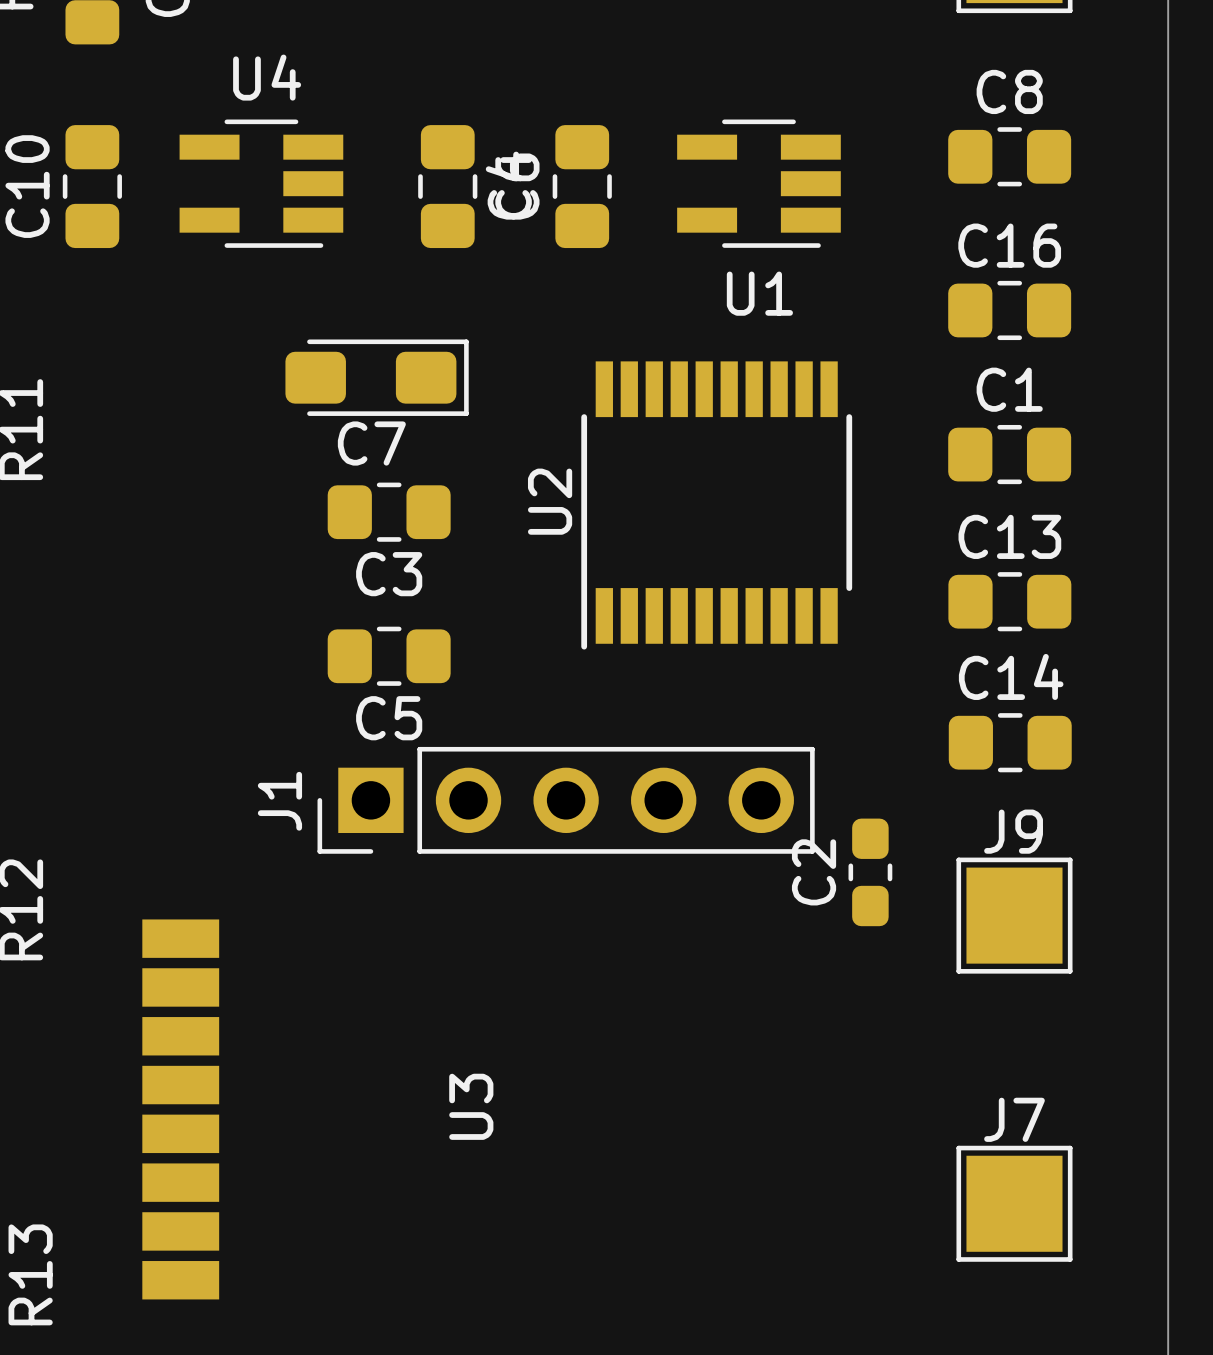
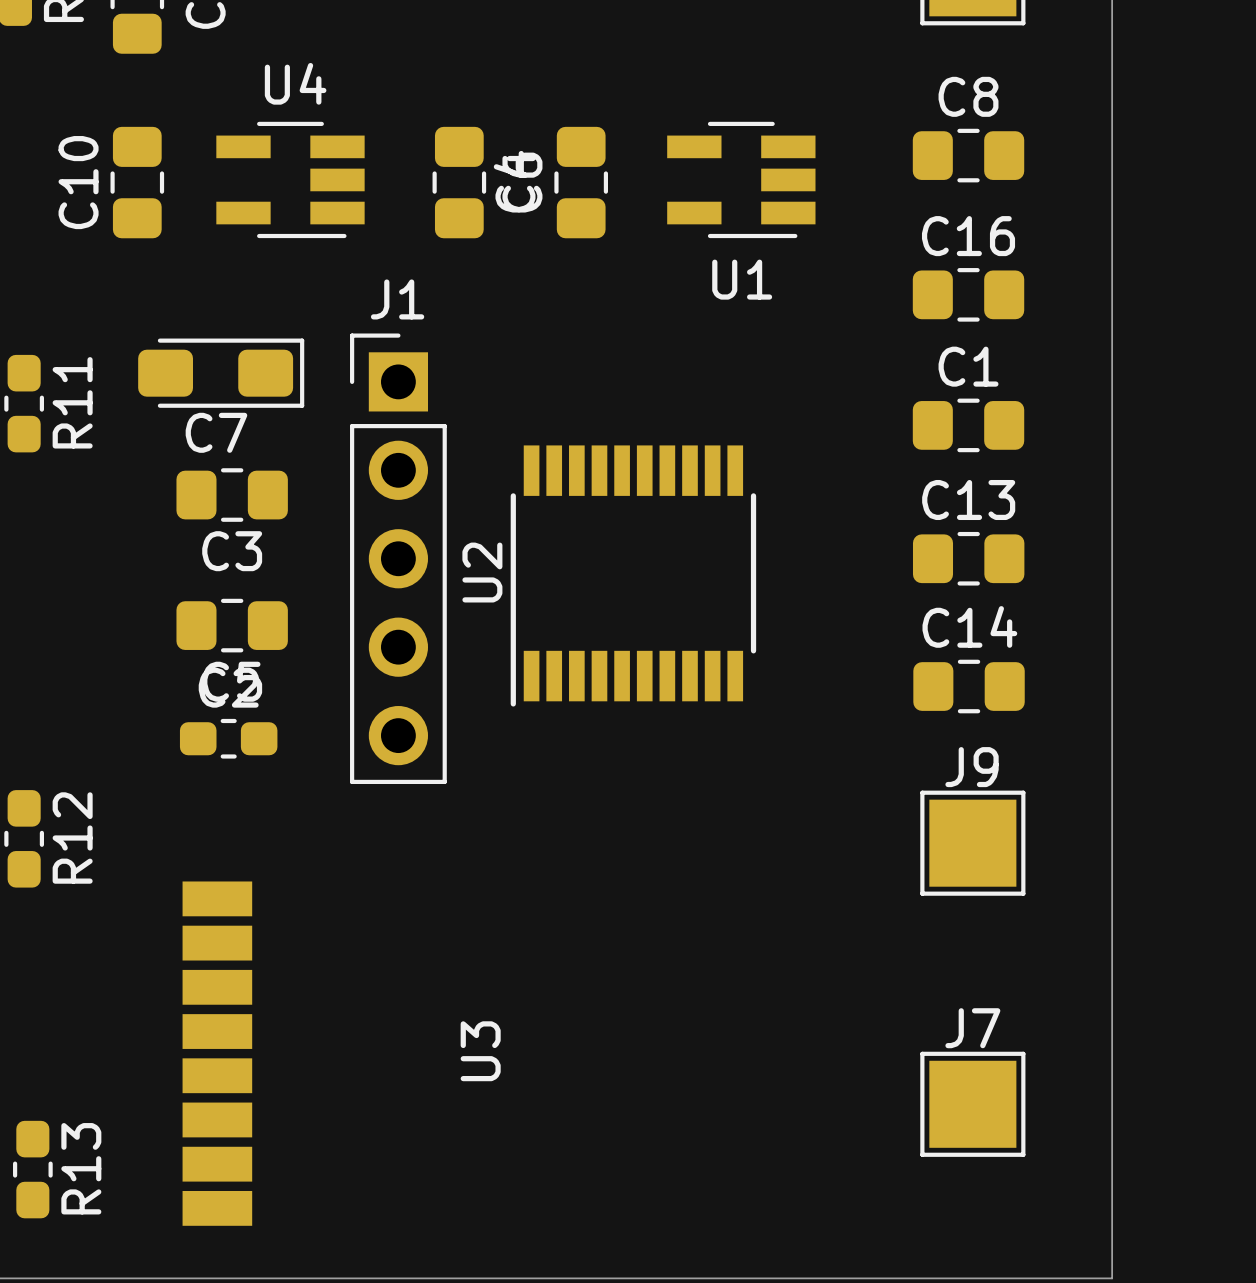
C7 position: (377, 377) -> (221, 373)
U2 position: (716, 505) -> (633, 575)
C3 position: (389, 512) -> (232, 495)
C5 position: (389, 656) -> (232, 625)
J1 rotation: 0° (566, 800) -> 90° clockwise (398, 558)
C2 rotation: 0° (870, 872) -> 90° clockwise (228, 738)
C2 position: (870, 872) -> (228, 738)
U3 position: (180, 1109) -> (217, 1053)

